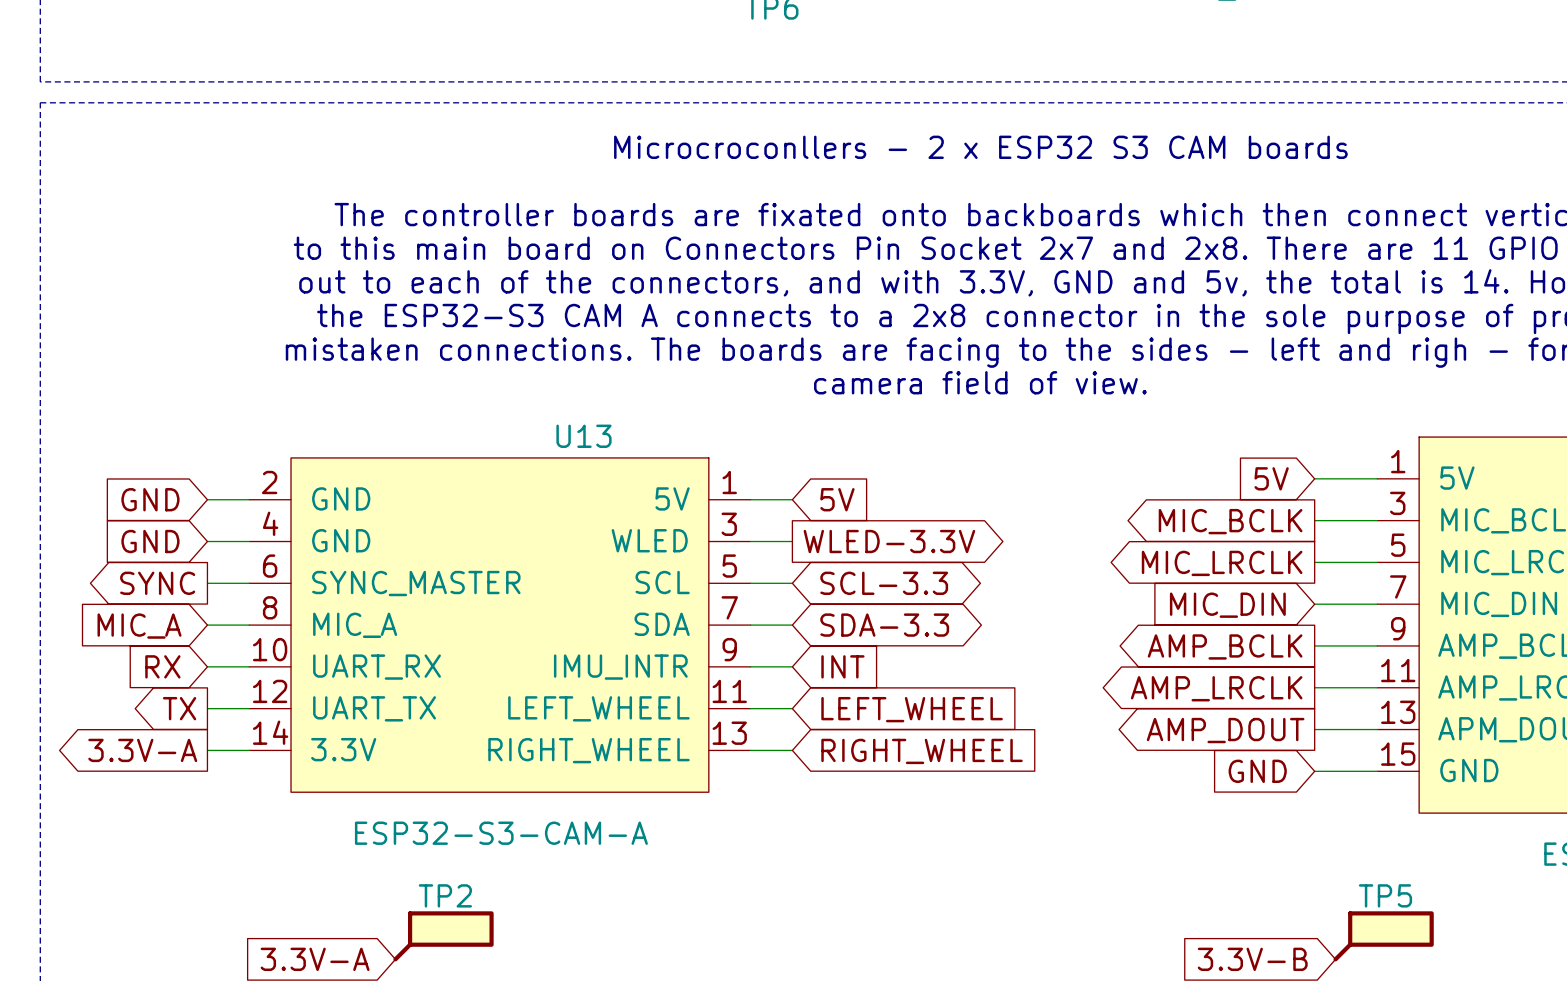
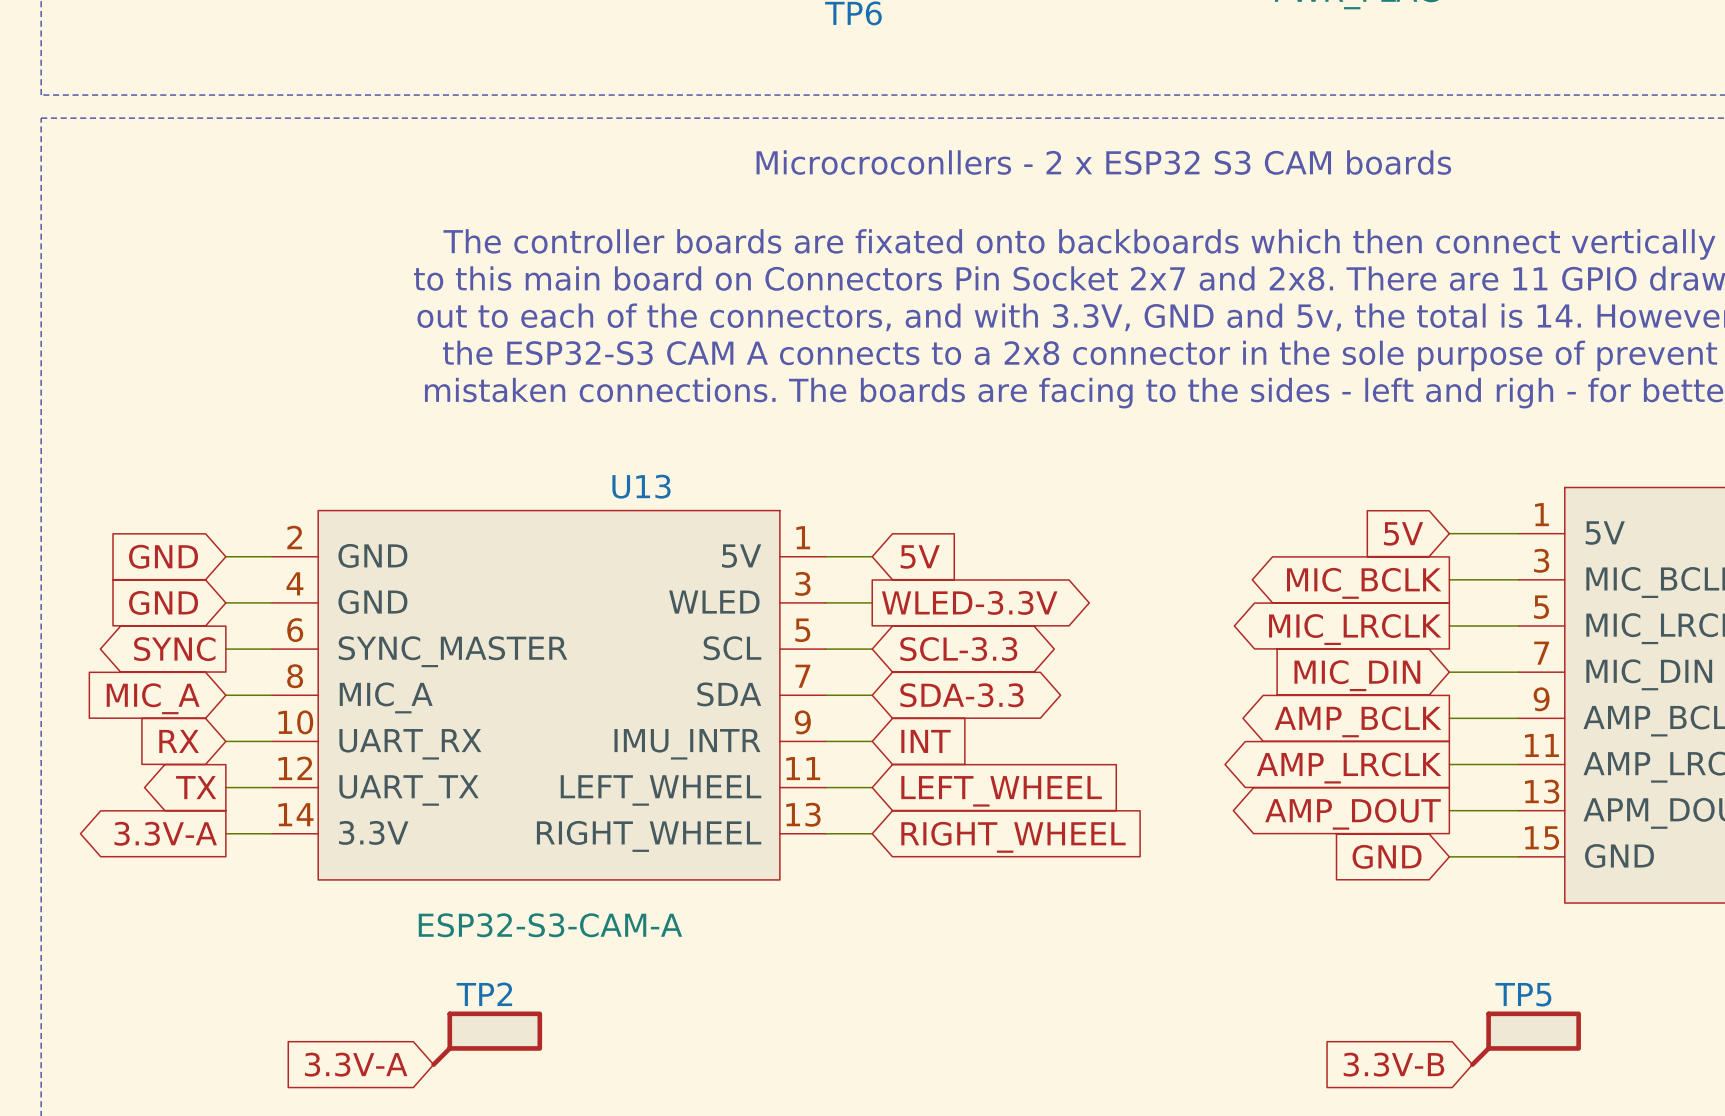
text position: Microcroconllers - 2 x ESP32 S3 CAM boards (980, 147) -> Microcroconllers - 2 x ESP32 S3 CAM boards (1103, 162)
text: camera field of view. (980, 382) -> none

